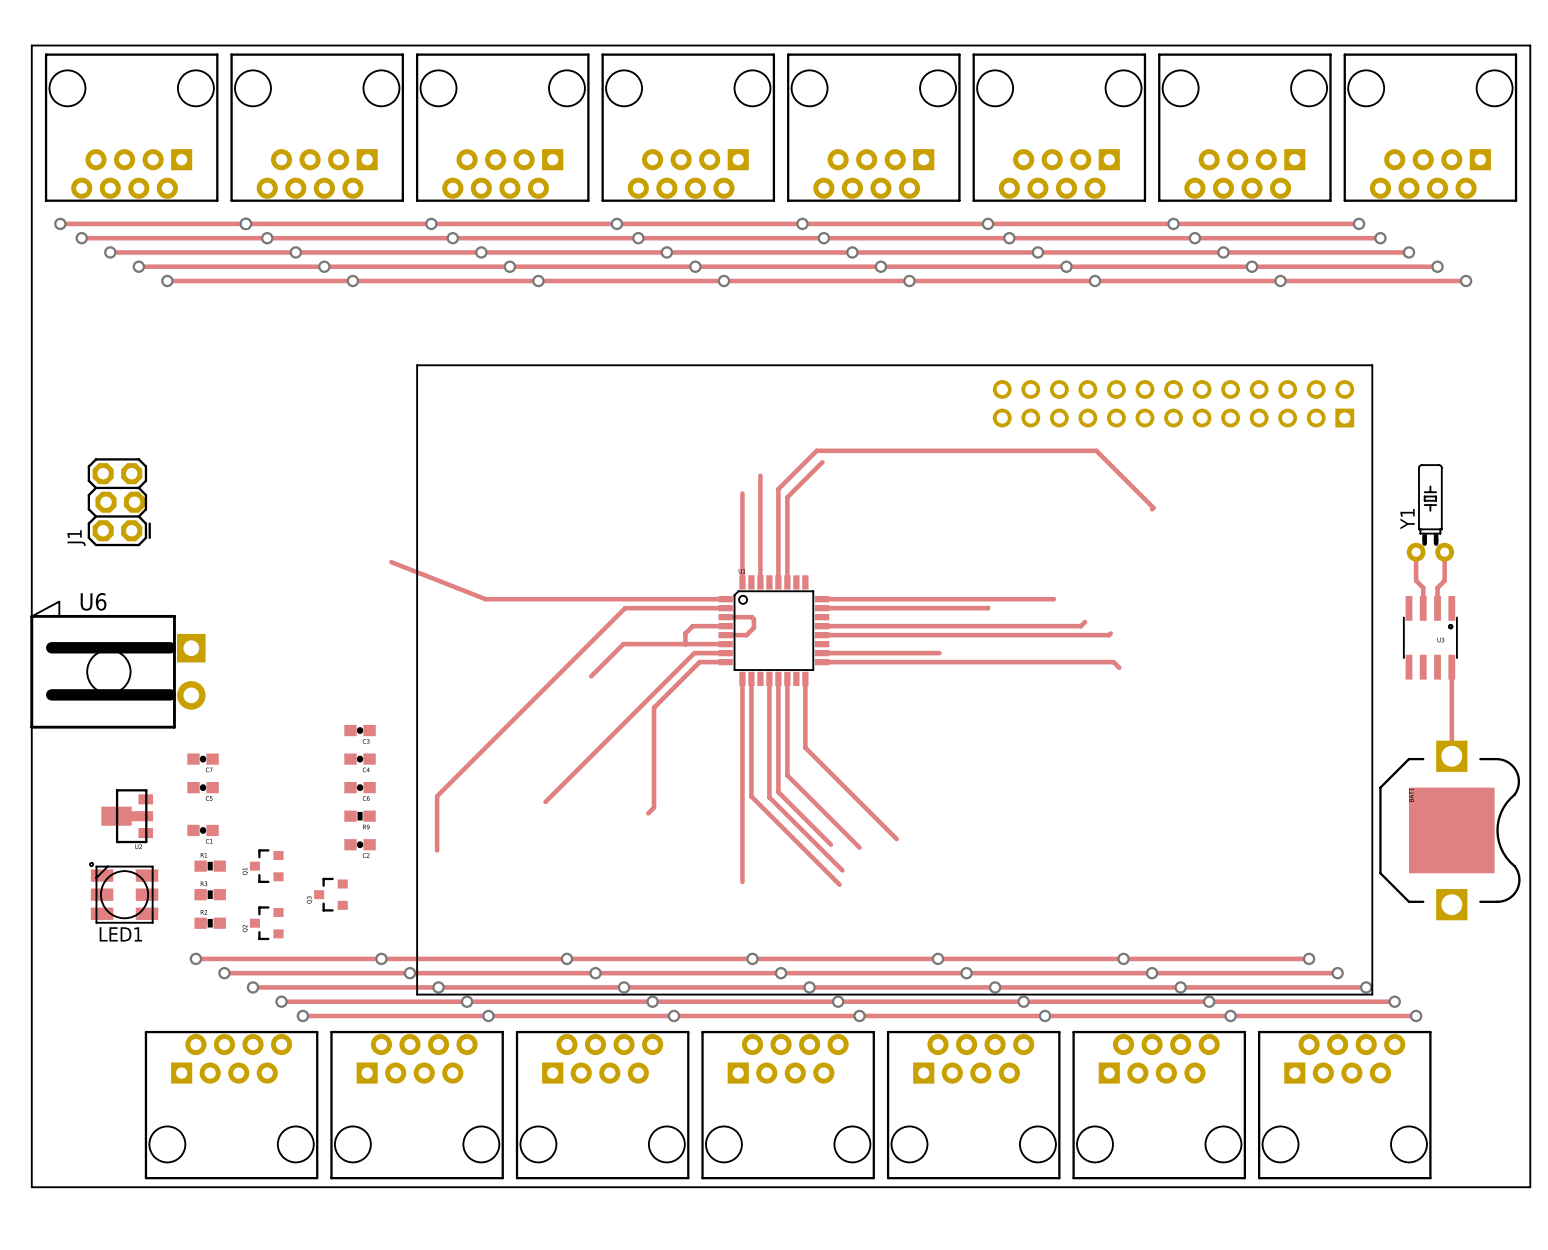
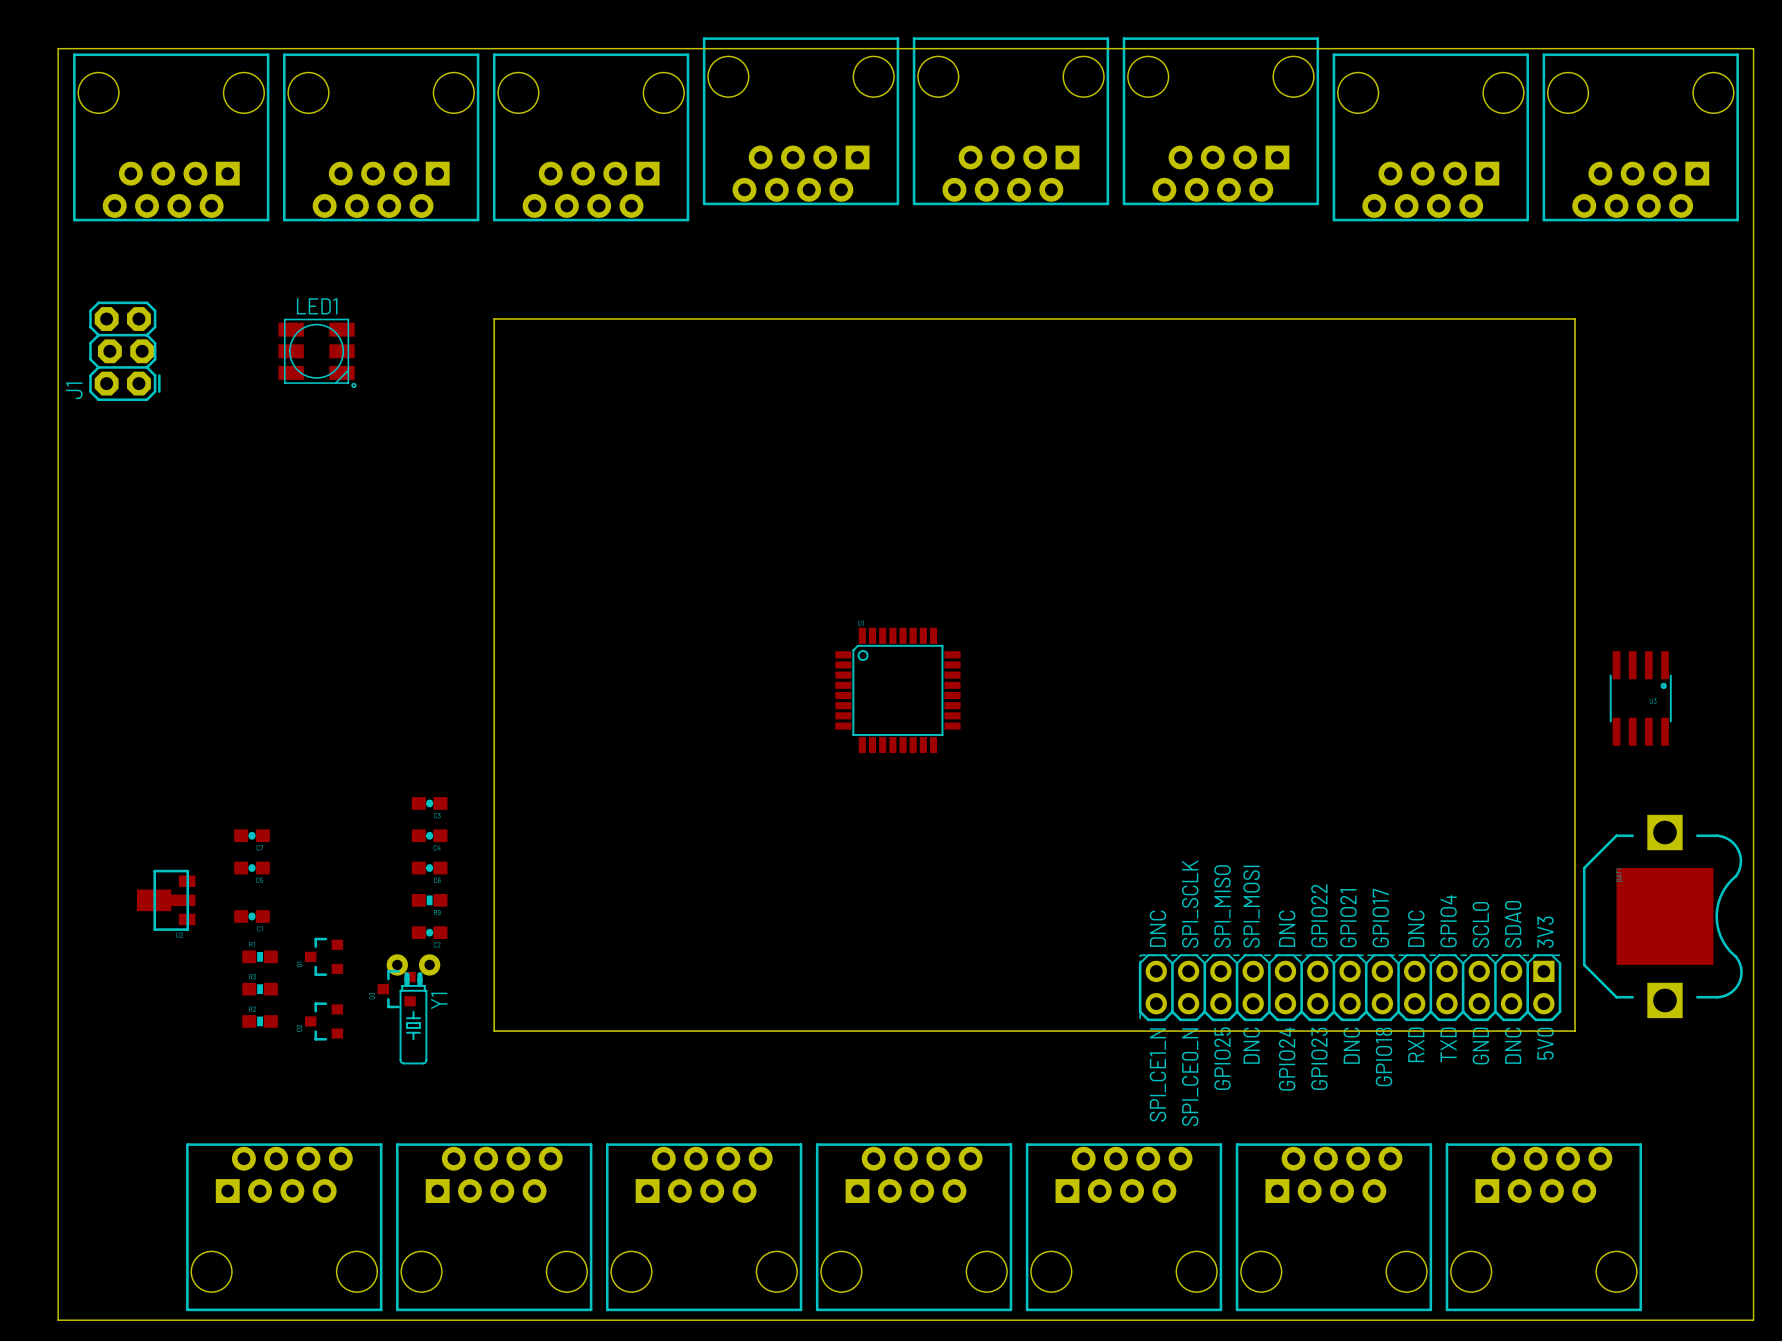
board edge: (31, 63) (31, 45) (1530, 45) (1530, 1187) -> (58, 48) (1753, 48) (1753, 1320)
part position: (131, 127) -> (171, 137)
part position: (317, 127) -> (381, 137)
part position: (502, 127) -> (591, 137)
part position: (1244, 127) -> (1430, 137)
part position: (1430, 127) -> (1640, 137)
track: (60, 223) (1359, 223) -> none
via: (60, 223) -> none
via: (245, 223) -> none
via: (431, 223) -> none
via: (616, 223) -> none
via: (802, 223) -> none
via: (987, 223) -> none
via: (1173, 223) -> none
via: (1359, 223) -> none
track: (81, 238) (1380, 238) -> none
via: (81, 238) -> none
via: (267, 238) -> none
via: (452, 238) -> none
via: (638, 238) -> none
via: (823, 238) -> none
via: (1009, 238) -> none
via: (1194, 238) -> none
via: (1380, 238) -> none
track: (110, 252) (1408, 252) -> none
via: (110, 252) -> none
via: (295, 252) -> none
via: (481, 252) -> none
via: (666, 252) -> none
via: (852, 252) -> none
via: (1037, 252) -> none
via: (1223, 252) -> none
via: (1408, 252) -> none
track: (138, 266) (1437, 266) -> none
via: (138, 266) -> none
via: (324, 266) -> none
via: (509, 266) -> none
via: (695, 266) -> none
via: (880, 266) -> none
via: (1066, 266) -> none
via: (1252, 266) -> none
via: (1437, 266) -> none
track: (167, 281) (1466, 281) -> none
via: (167, 281) -> none
via: (352, 281) -> none
via: (538, 281) -> none
via: (723, 281) -> none
via: (909, 281) -> none
via: (1095, 281) -> none
via: (1280, 281) -> none
via: (1466, 281) -> none
track: (822, 462) (787, 497) (787, 582) -> none
track: (760, 475) (760, 582) -> none
track: (742, 493) (742, 582) -> none
J1 position: (119, 502) -> (124, 351)
track: (1152, 509) (1153, 507) (1096, 450) (816, 450) (778, 489) (778, 582) -> none
Y1 rotation: 0° (1430, 512) -> 180° (413, 1009)
Y1 position: (1430, 512) -> (413, 1009)
track: (1416, 552) (1416, 580) (1423, 587) (1423, 608) -> none
track: (1444, 552) (1444, 580) (1437, 587) (1437, 608) -> none
track: (391, 562) (485, 599) (725, 599) -> none
track: (822, 599) (1053, 599) -> none
track: (987, 607) (822, 608) -> none
track: (725, 608) (625, 608) (437, 796) (437, 850) -> none
track: (725, 617) (751, 617) (753, 619) (753, 627) (746, 635) (725, 635) -> none
track: (1085, 622) (1080, 626) (822, 626) -> none
track: (725, 626) (692, 626) (685, 633) (685, 644) -> none
track: (1110, 633) (1109, 635) (822, 635) -> none
track: (725, 644) (623, 644) (591, 676) -> none
track: (725, 653) (694, 653) (545, 801) -> none
track: (822, 653) (939, 653) -> none
track: (725, 662) (699, 662) (654, 707) (654, 807) (648, 813) -> none
track: (822, 662) (1113, 662) (1119, 667) -> none
U6: (117, 664) -> none
track: (1451, 667) (1451, 756) -> none
track: (742, 678) (742, 881) -> none
track: (751, 678) (751, 796) (839, 884) -> none
track: (769, 678) (769, 797) (842, 870) -> none
track: (778, 678) (778, 792) (830, 844) -> none
track: (787, 678) (787, 775) (859, 847) -> none
track: (805, 678) (805, 747) (896, 839) -> none
part side: bottom (894, 679) -> top (1034, 675)
LED1 rotation: 0° (123, 892) -> 180° (317, 353)
LED1 position: (123, 892) -> (317, 353)
track: (195, 958) (1309, 958) -> none
via: (195, 958) -> none
via: (381, 958) -> none
via: (566, 958) -> none
via: (752, 958) -> none
via: (938, 958) -> none
via: (1123, 958) -> none
via: (1309, 958) -> none
track: (224, 973) (1337, 973) -> none
via: (224, 973) -> none
via: (409, 973) -> none
via: (595, 973) -> none
via: (781, 973) -> none
via: (966, 973) -> none
via: (1152, 973) -> none
via: (1337, 973) -> none
track: (252, 987) (1366, 987) -> none
via: (252, 987) -> none
via: (438, 987) -> none
via: (624, 987) -> none
via: (809, 987) -> none
via: (995, 987) -> none
via: (1180, 987) -> none
via: (1366, 987) -> none
track: (281, 1001) (1394, 1001) -> none
via: (281, 1001) -> none
via: (467, 1001) -> none
via: (652, 1001) -> none
via: (838, 1001) -> none
via: (1023, 1001) -> none
via: (1209, 1001) -> none
via: (1394, 1001) -> none
track: (302, 1015) (1416, 1015) -> none
via: (302, 1015) -> none
via: (488, 1015) -> none
via: (674, 1015) -> none
via: (859, 1015) -> none
via: (1045, 1015) -> none
via: (1230, 1015) -> none
via: (1416, 1015) -> none

